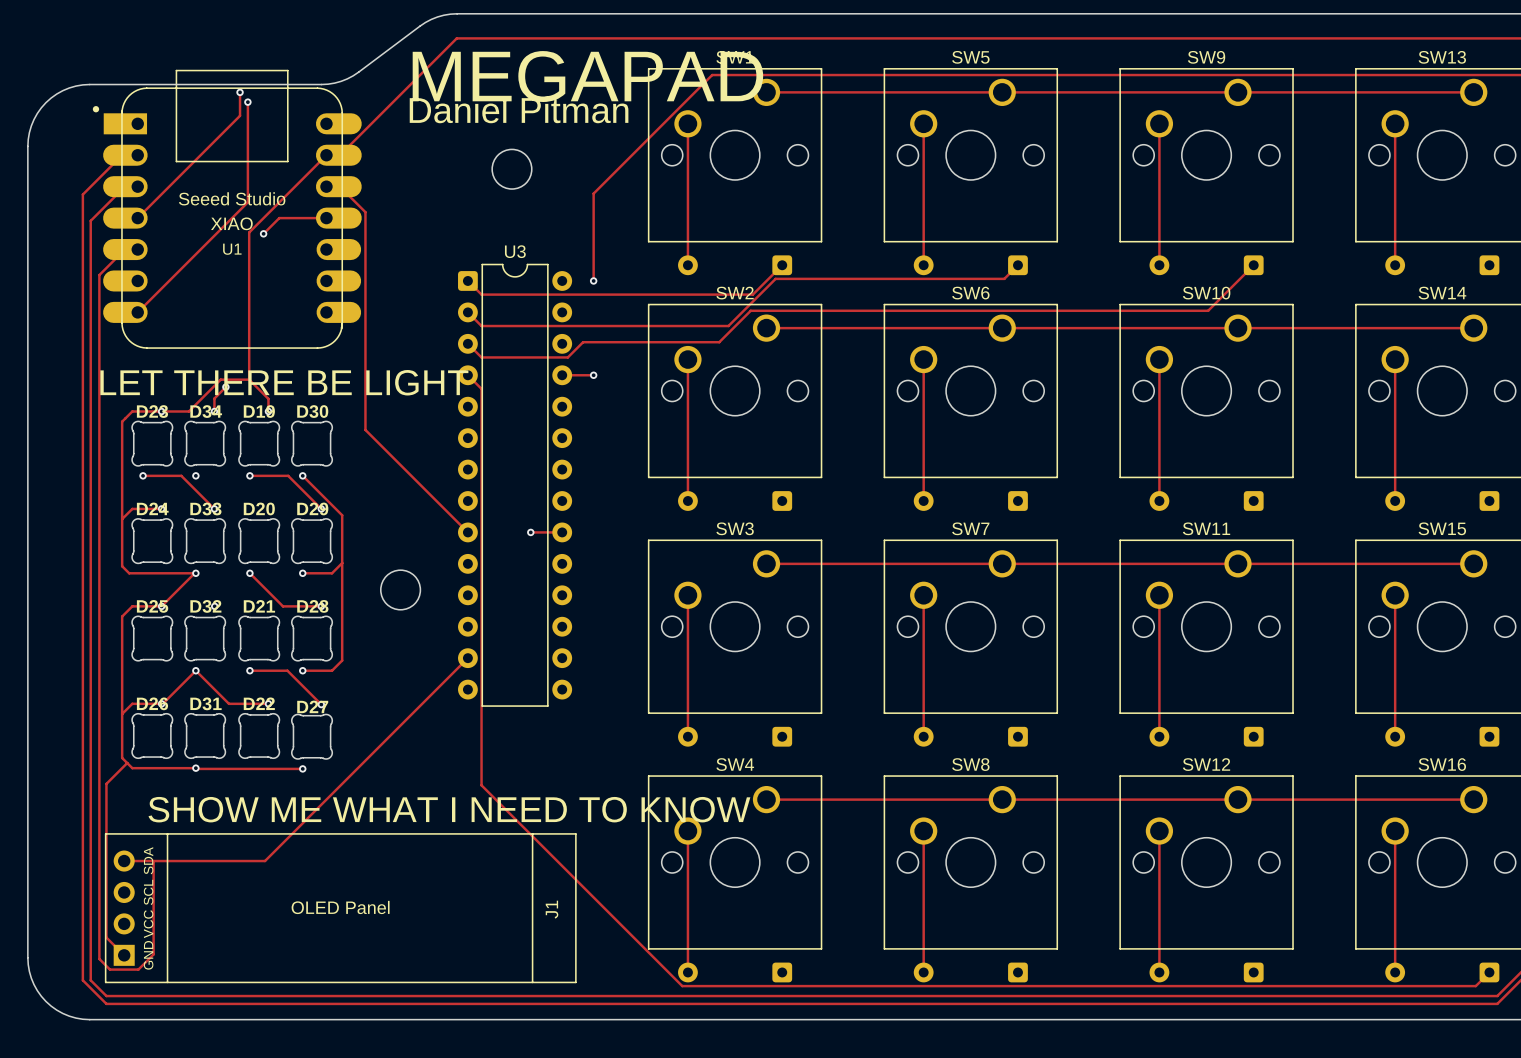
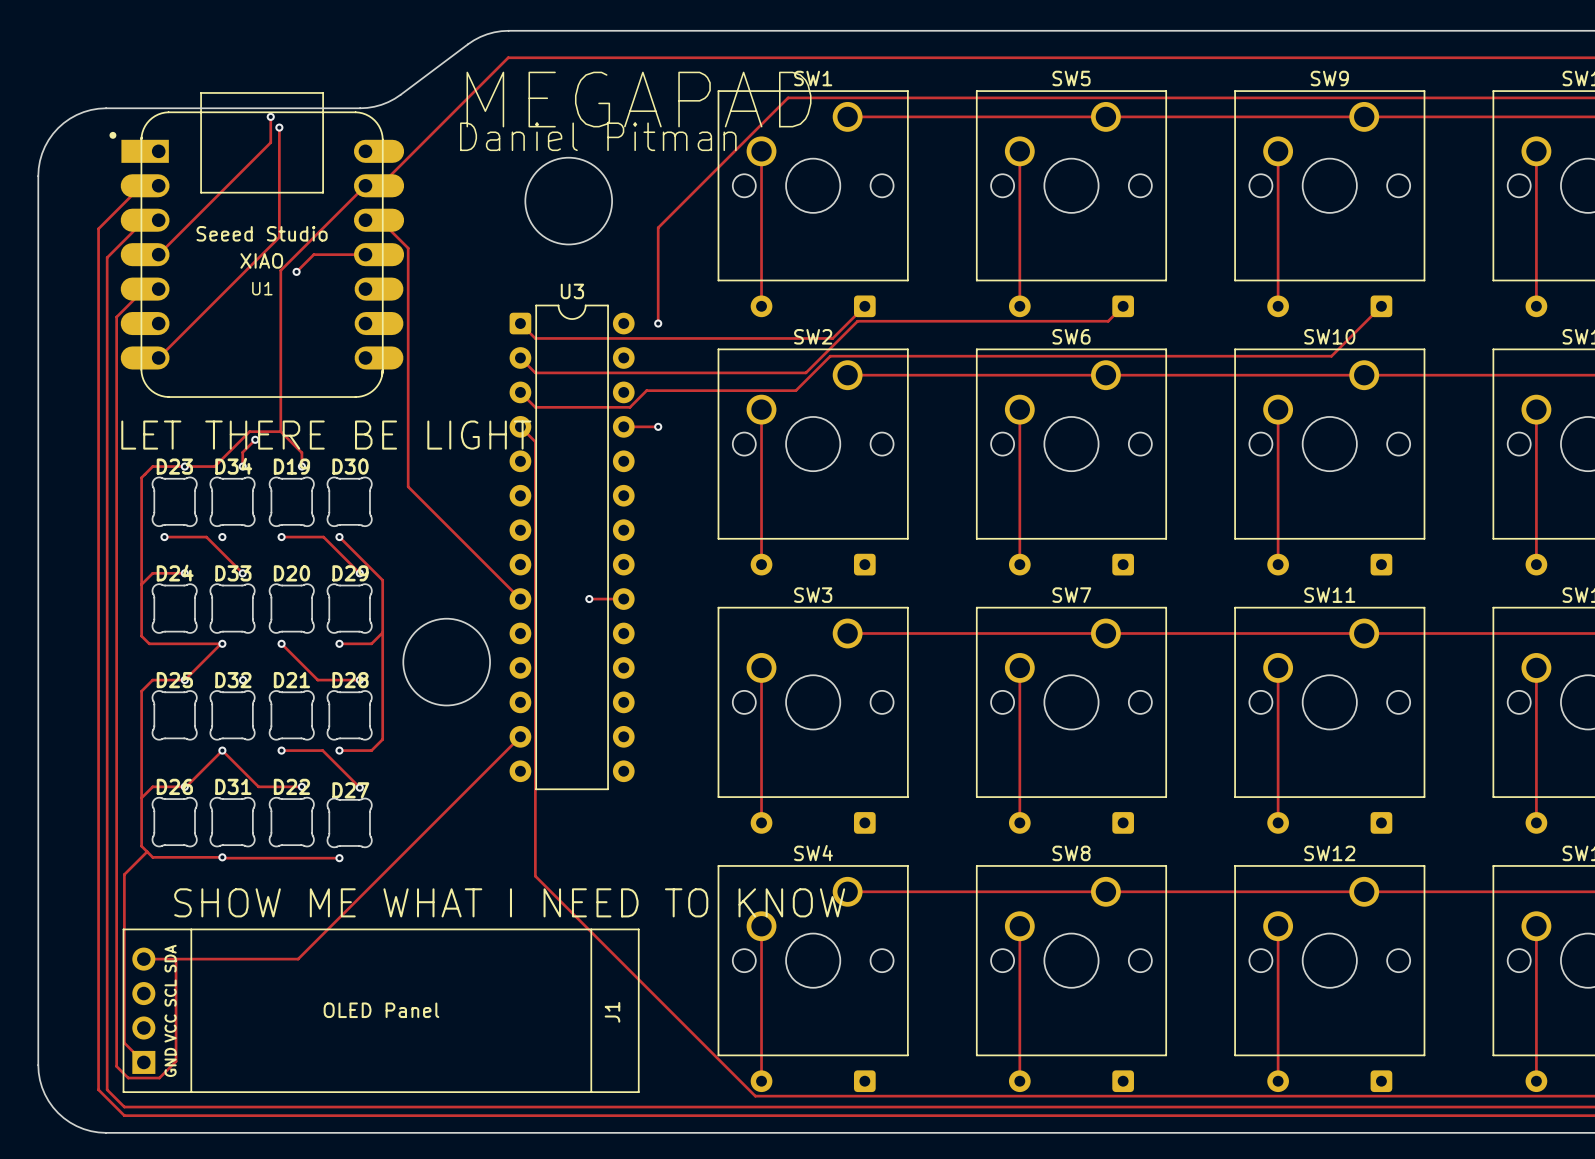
round board edge size: [491, 149, 533, 190] -> [524, 157, 613, 245]
round board edge size: [380, 569, 421, 611] -> [402, 618, 491, 706]

